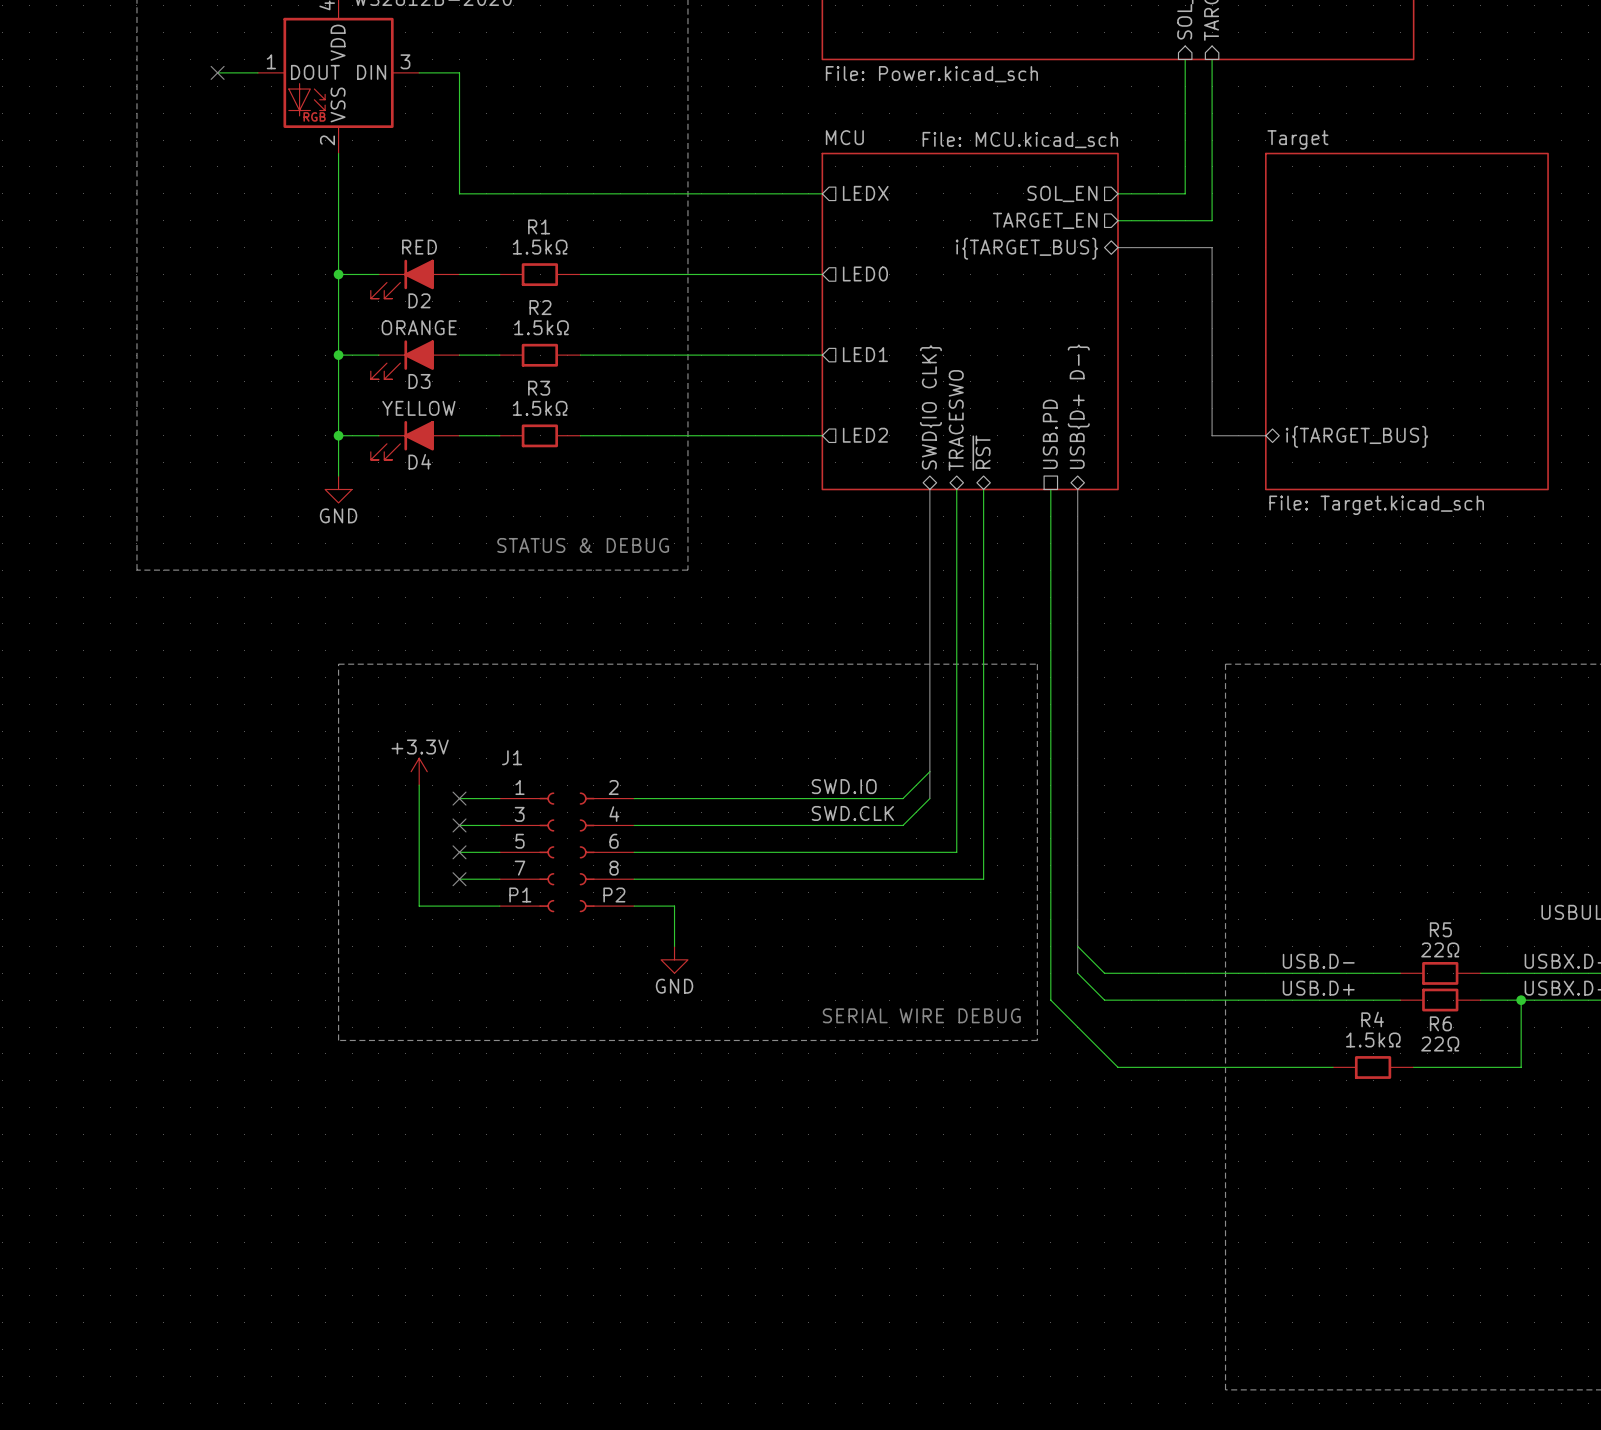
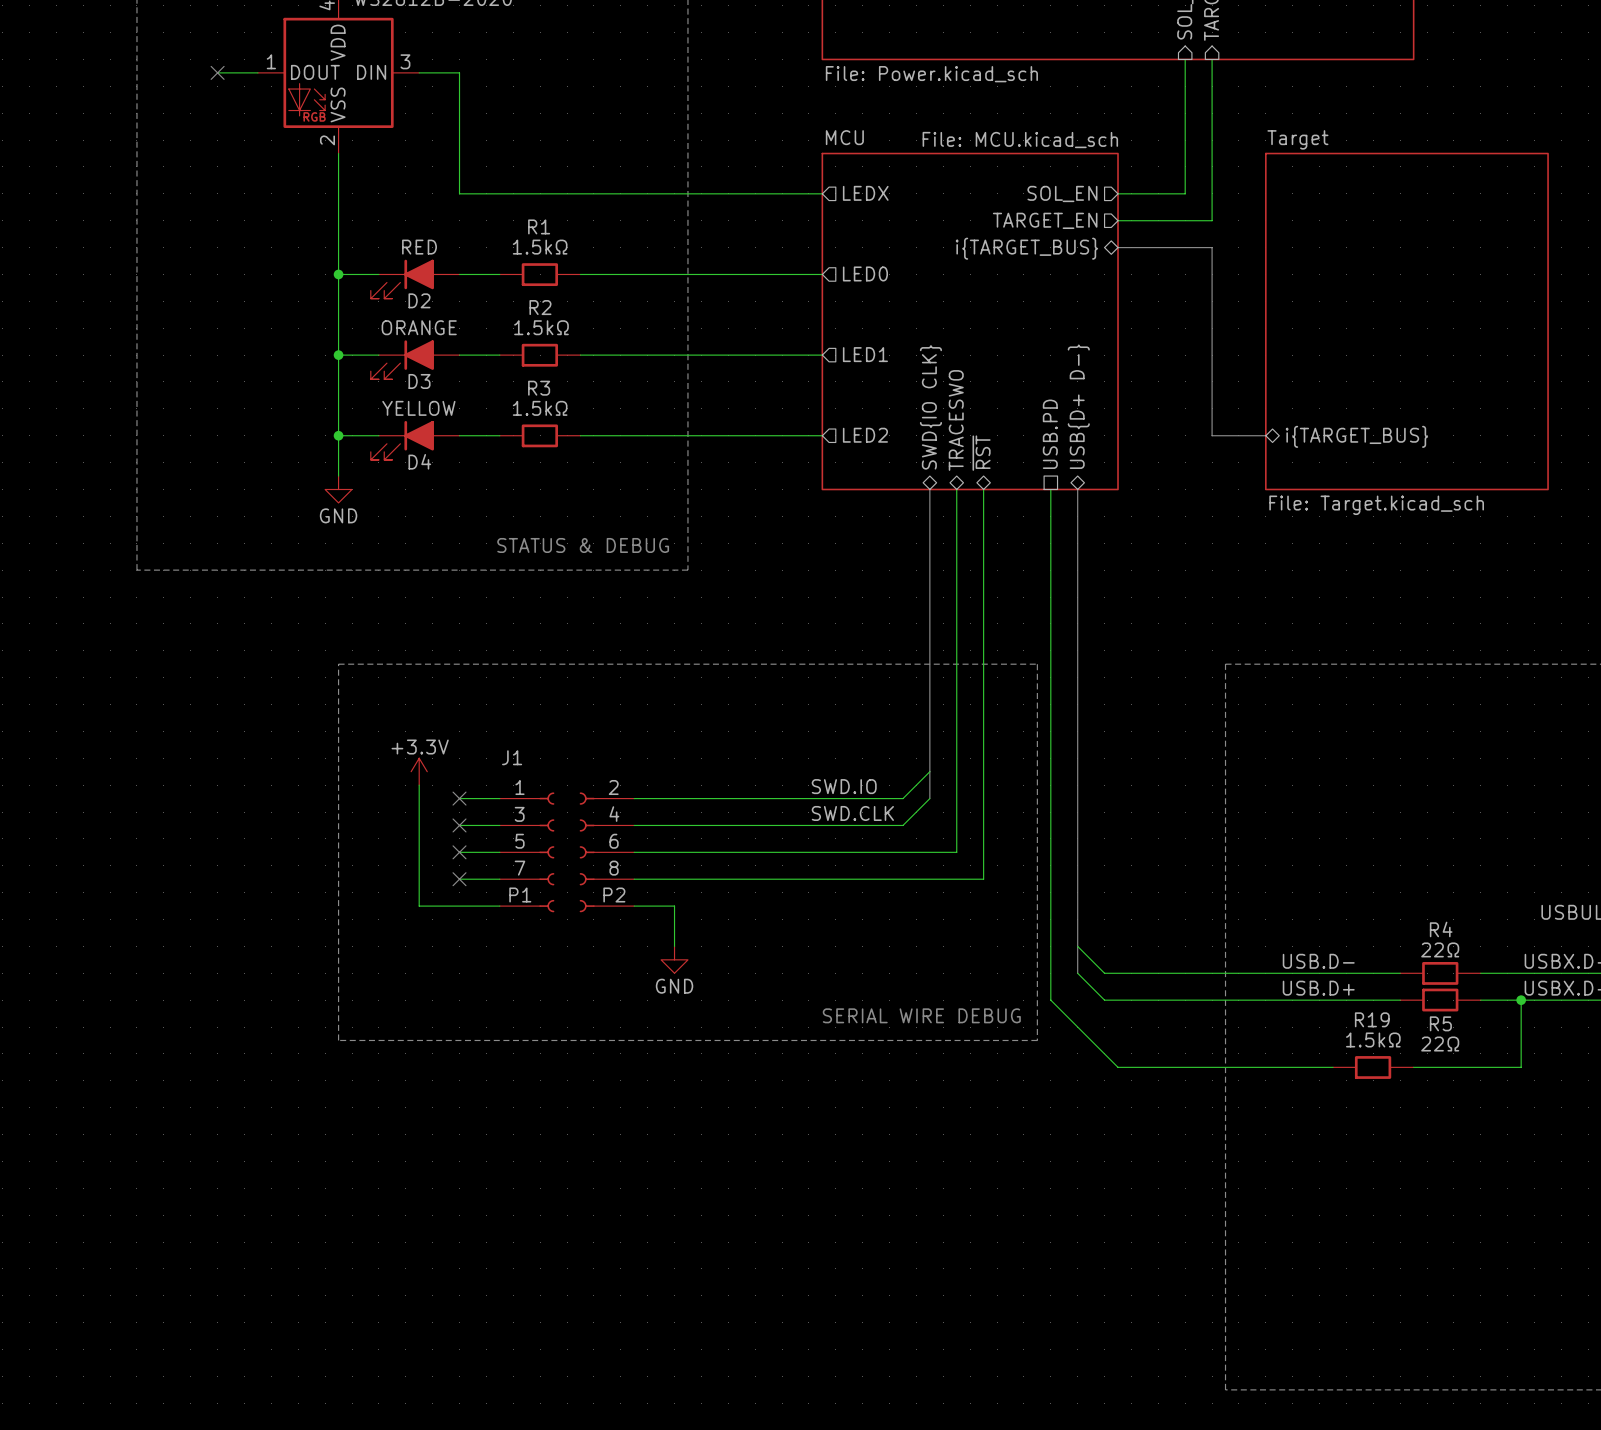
R5 name: R5 (1440, 929) -> R4 (1441, 929)
R4 name: R4 (1372, 1019) -> R19 (1372, 1019)
R6 name: R6 (1440, 1023) -> R5 (1440, 1023)

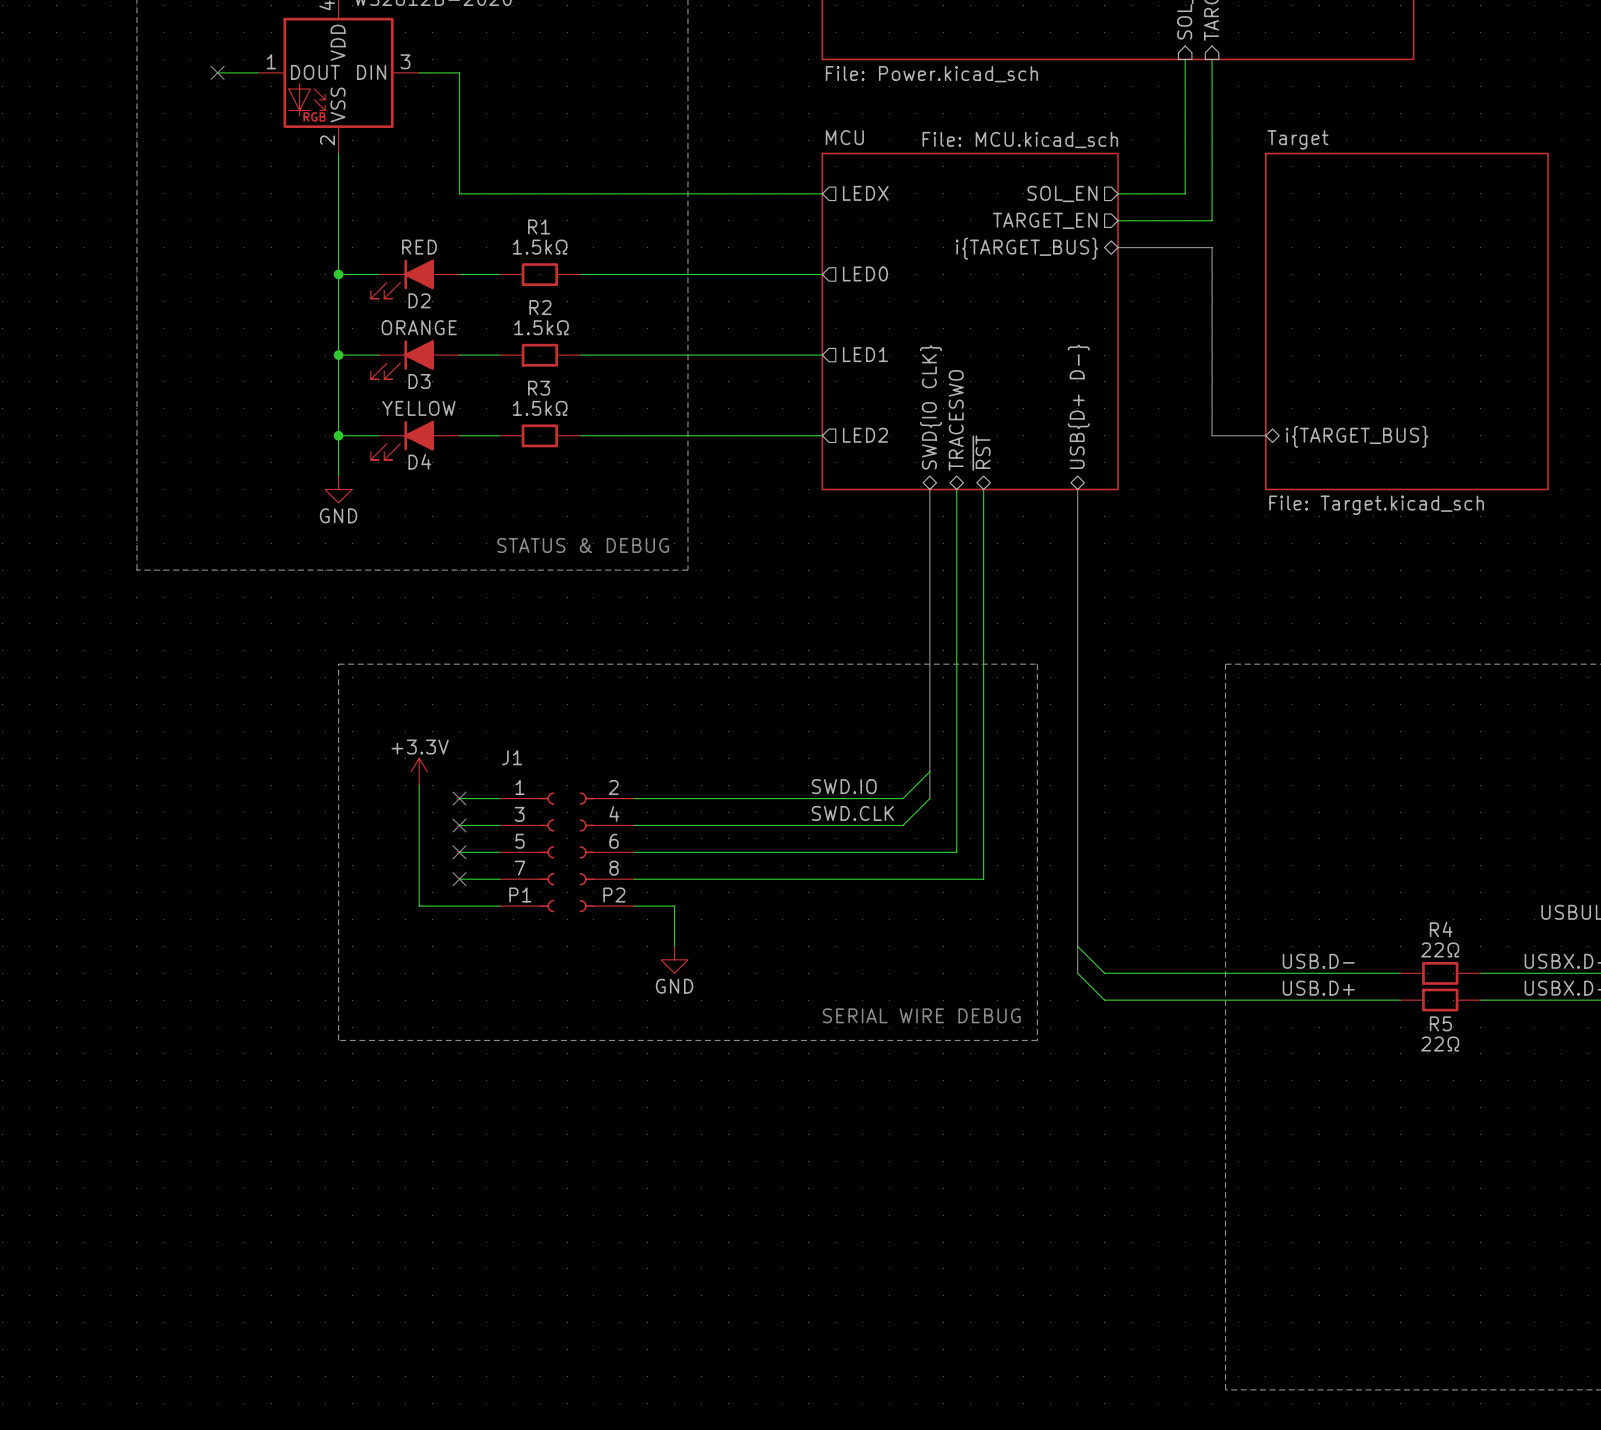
sheet pin: USB.PD (1050, 434) -> none
wire: (1050, 489) (1050, 1000) (1118, 1067) (1333, 1067) -> none
wire: (1521, 1000) (1521, 1067) (1413, 1067) -> none
junction: (1521, 1000) -> none
R19: 1.5kΩ (1373, 1067) -> none

